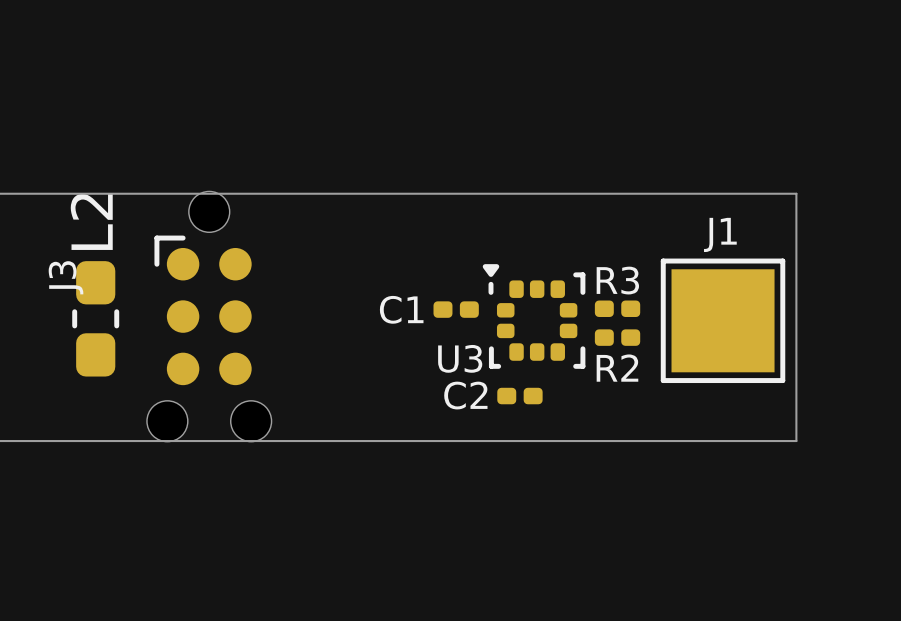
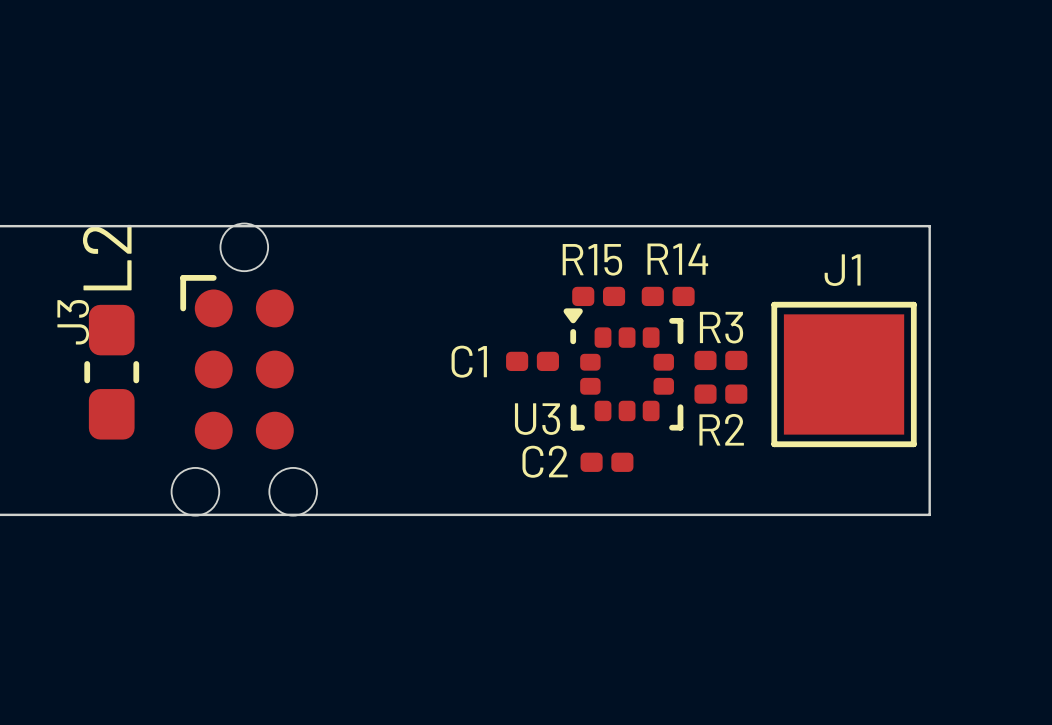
R15: none -> (598, 296)
R14: none -> (668, 296)

